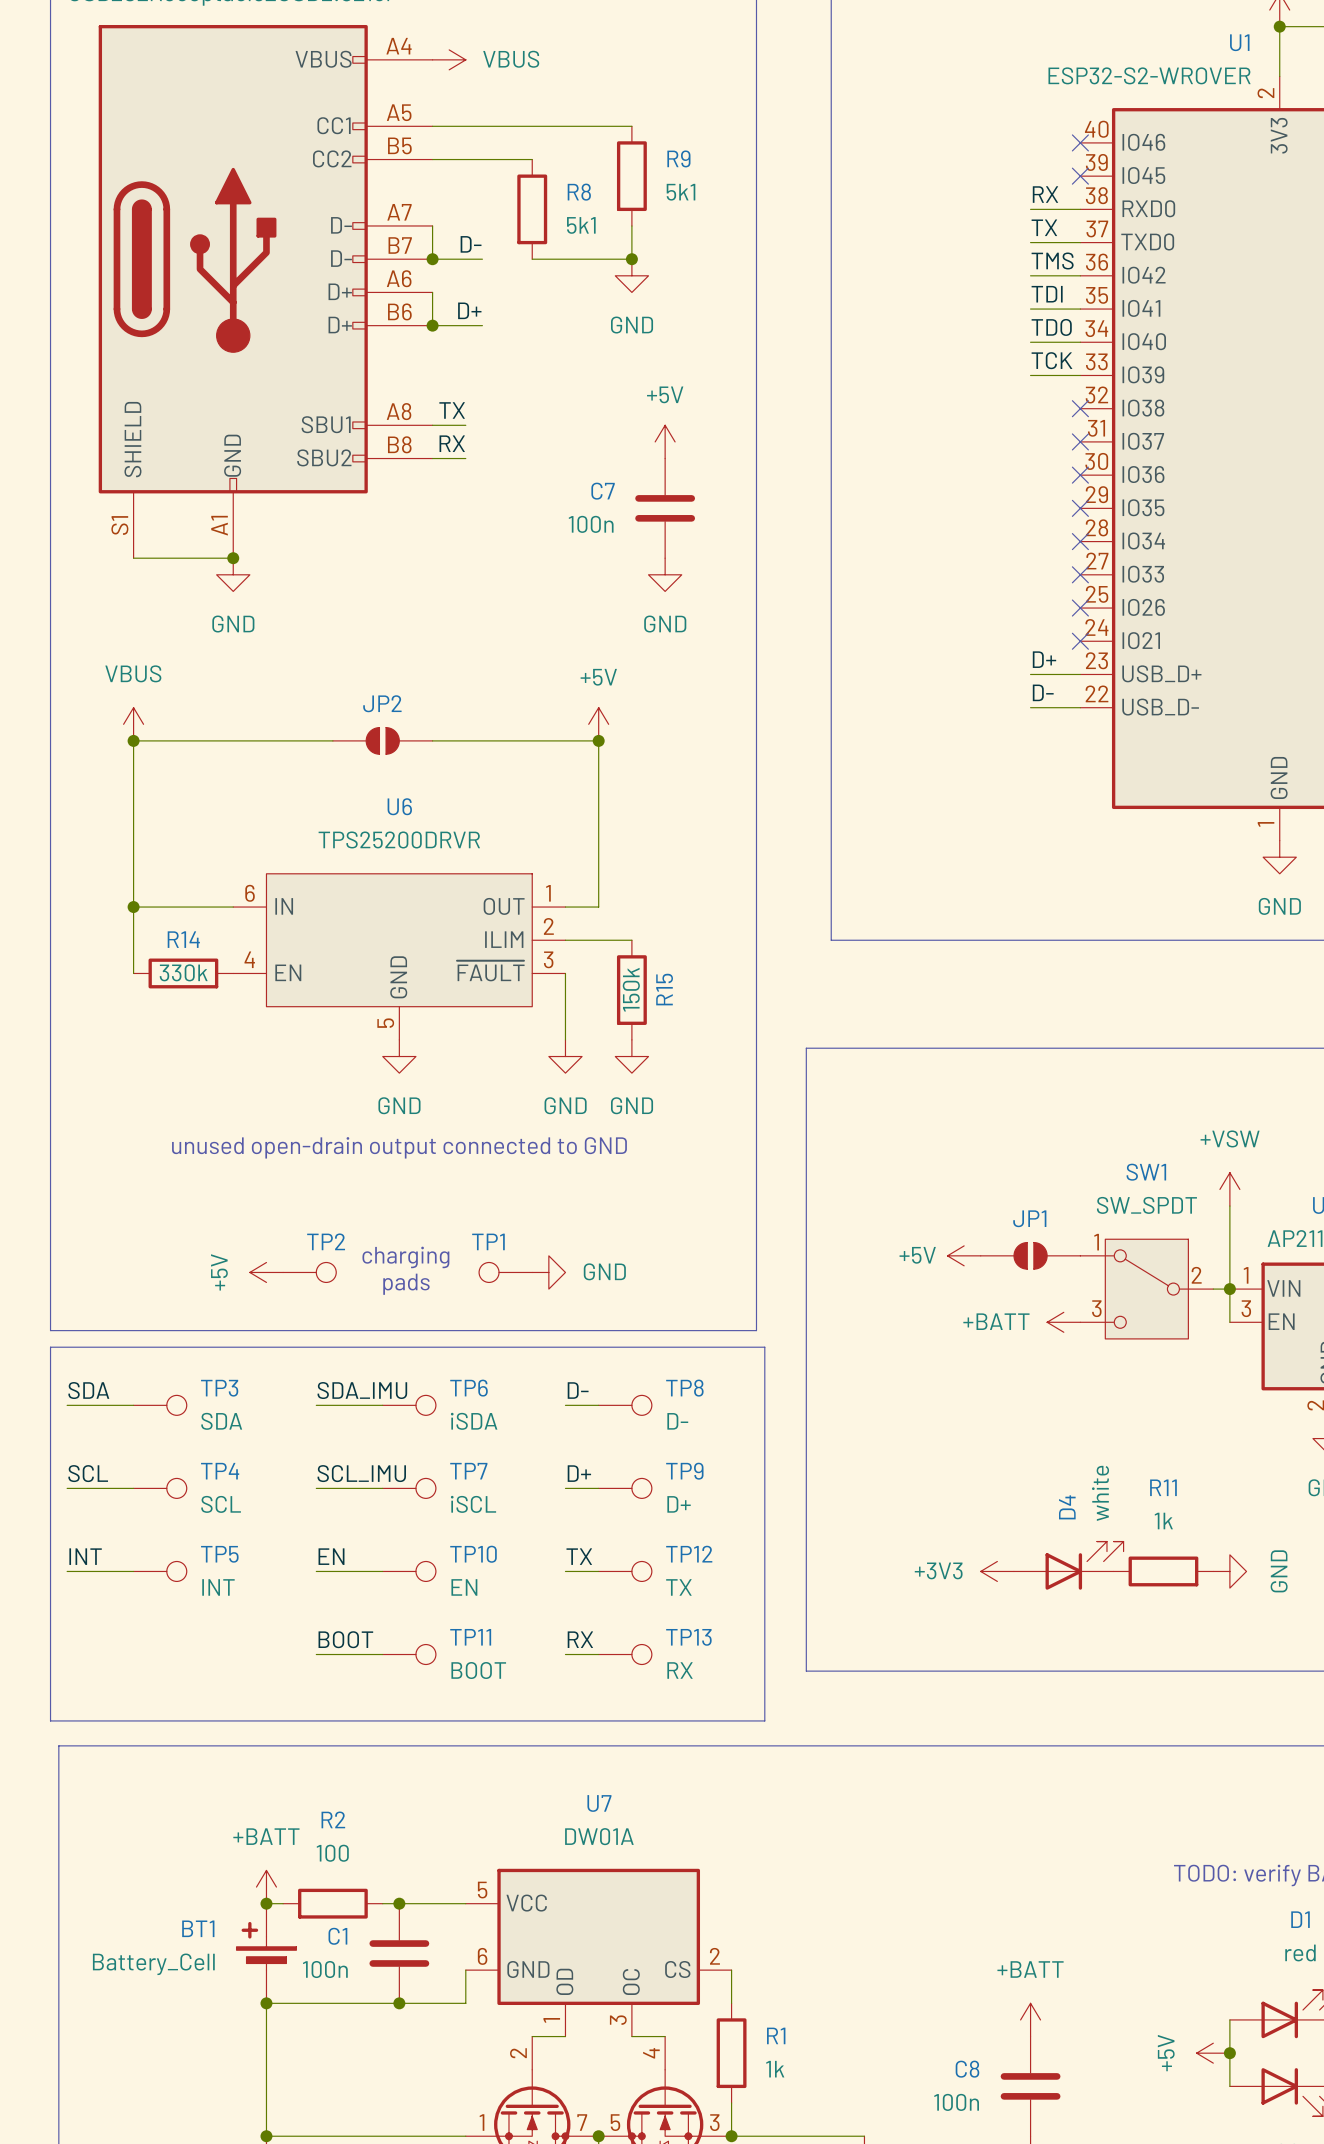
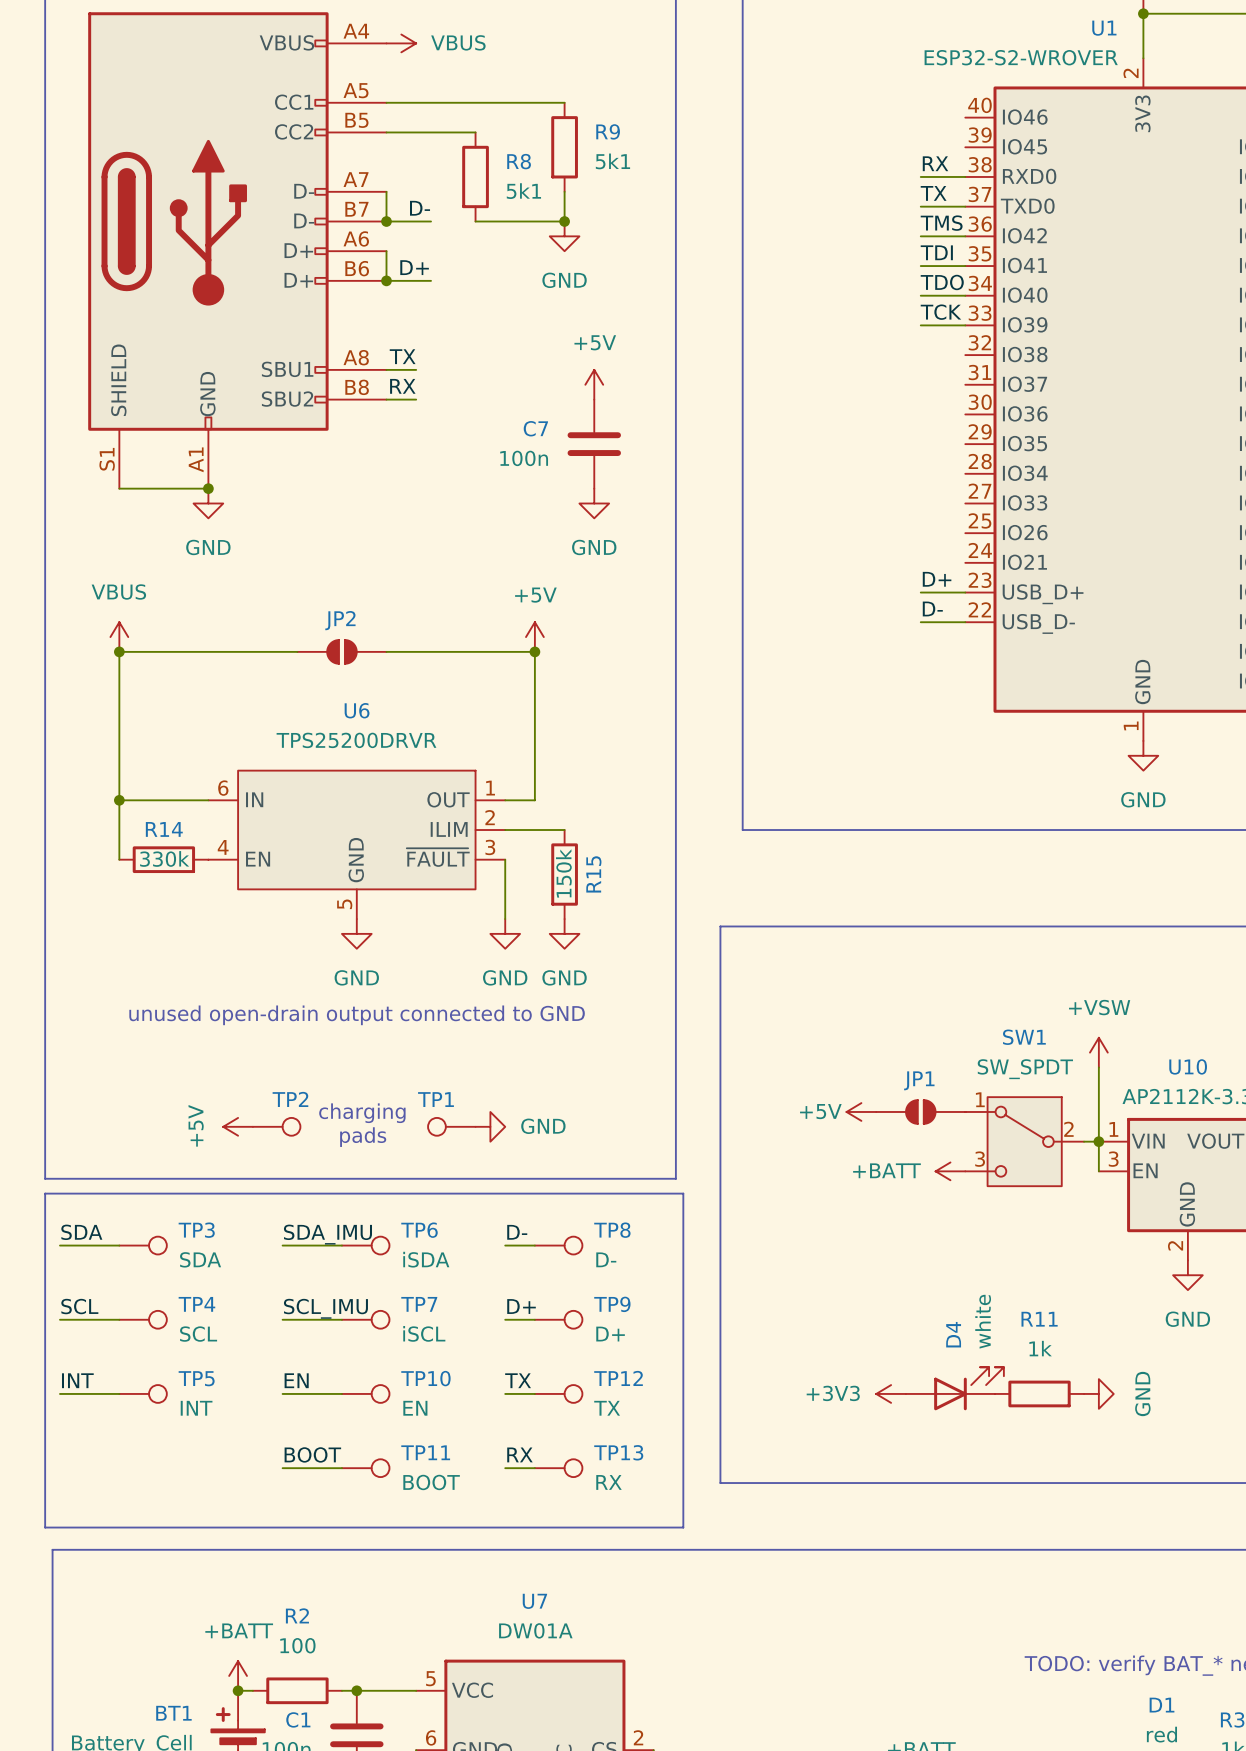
no-connect mark: (1080, 142) -> none
no-connect mark: (1080, 176) -> none
no-connect mark: (1080, 408) -> none
no-connect mark: (1080, 441) -> none
no-connect mark: (1080, 475) -> none
no-connect mark: (1080, 508) -> none
no-connect mark: (1080, 541) -> none
no-connect mark: (1080, 574) -> none
no-connect mark: (1080, 608) -> none
no-connect mark: (1080, 641) -> none

